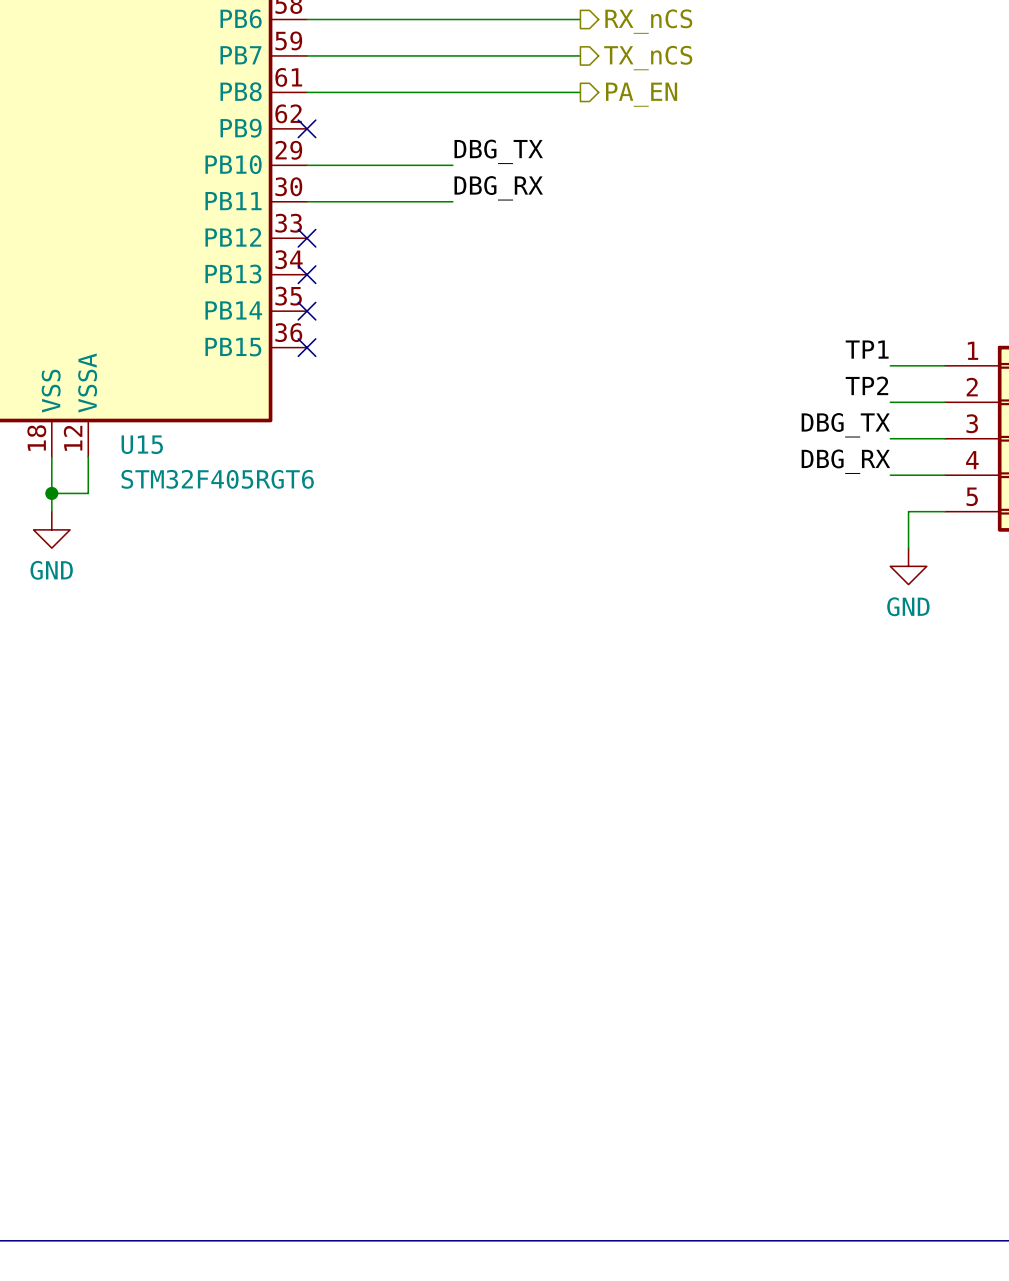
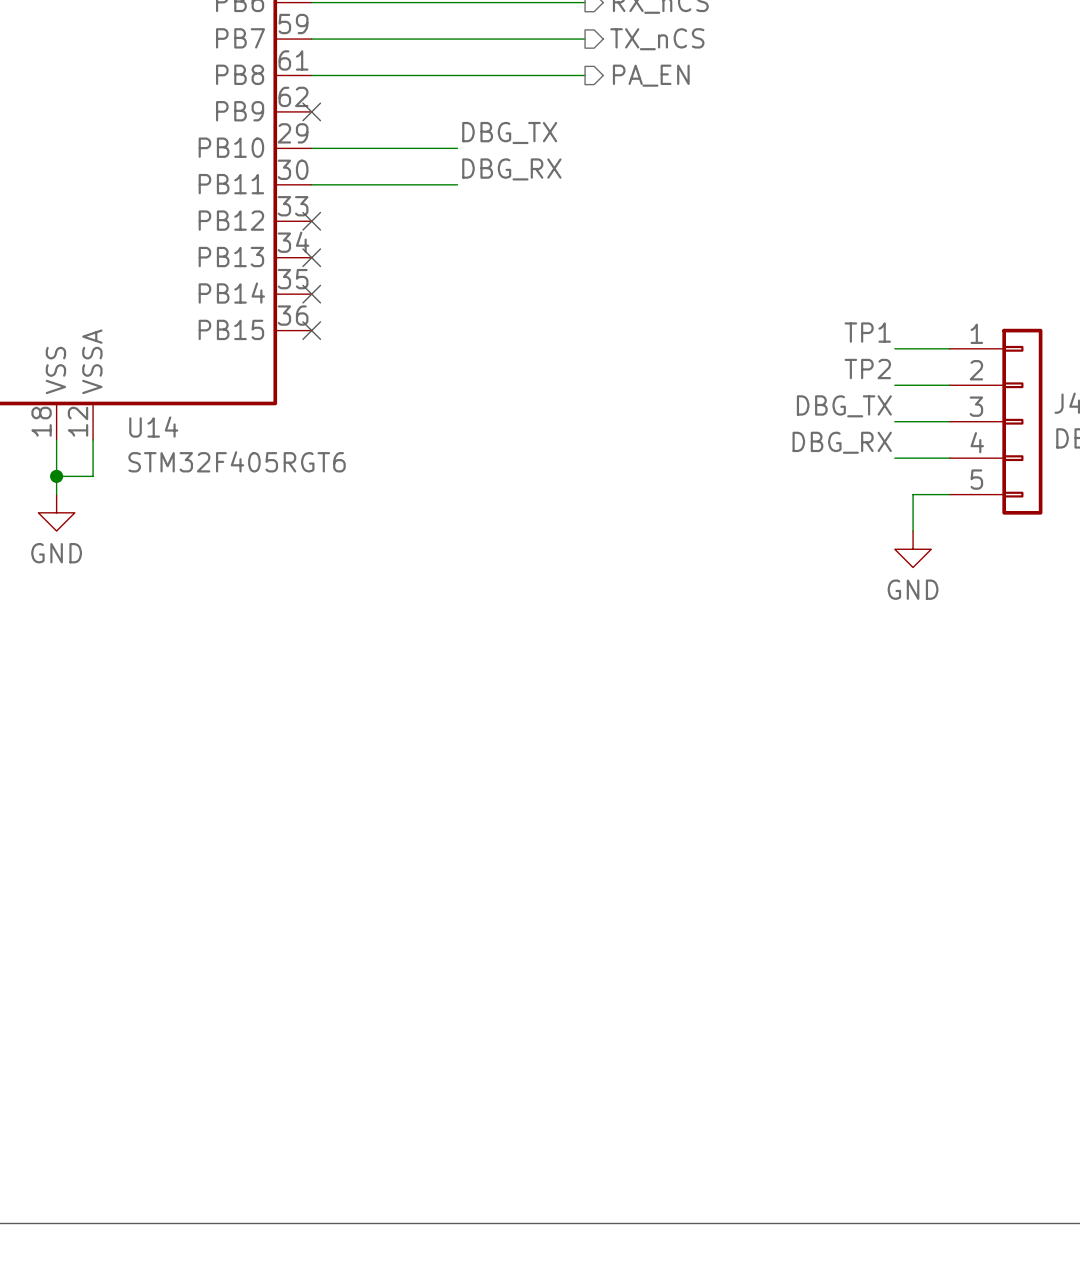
U15 name: U15 (142, 444) -> U14 (153, 427)

